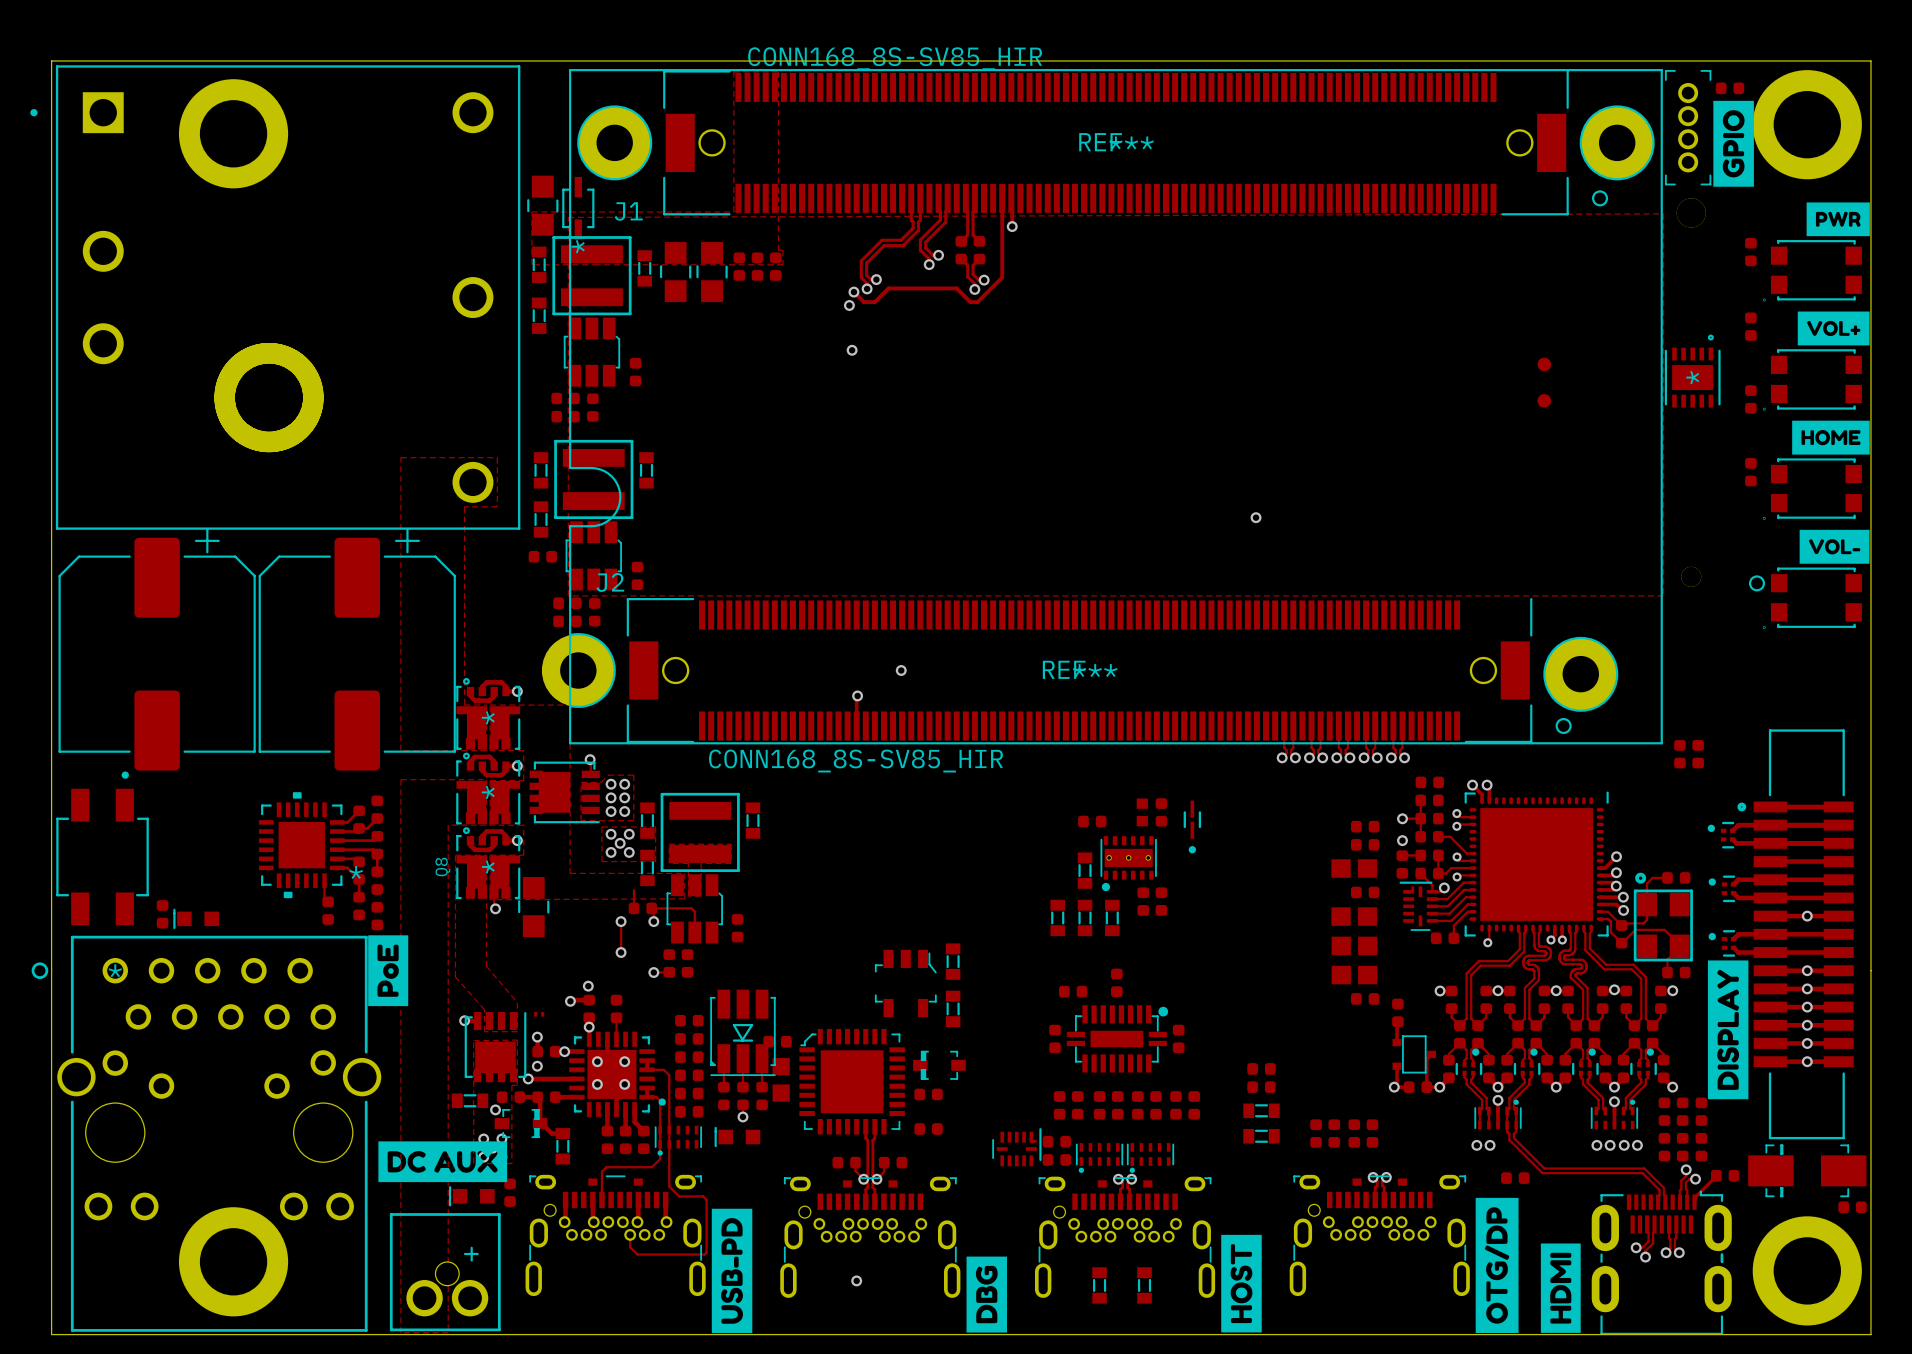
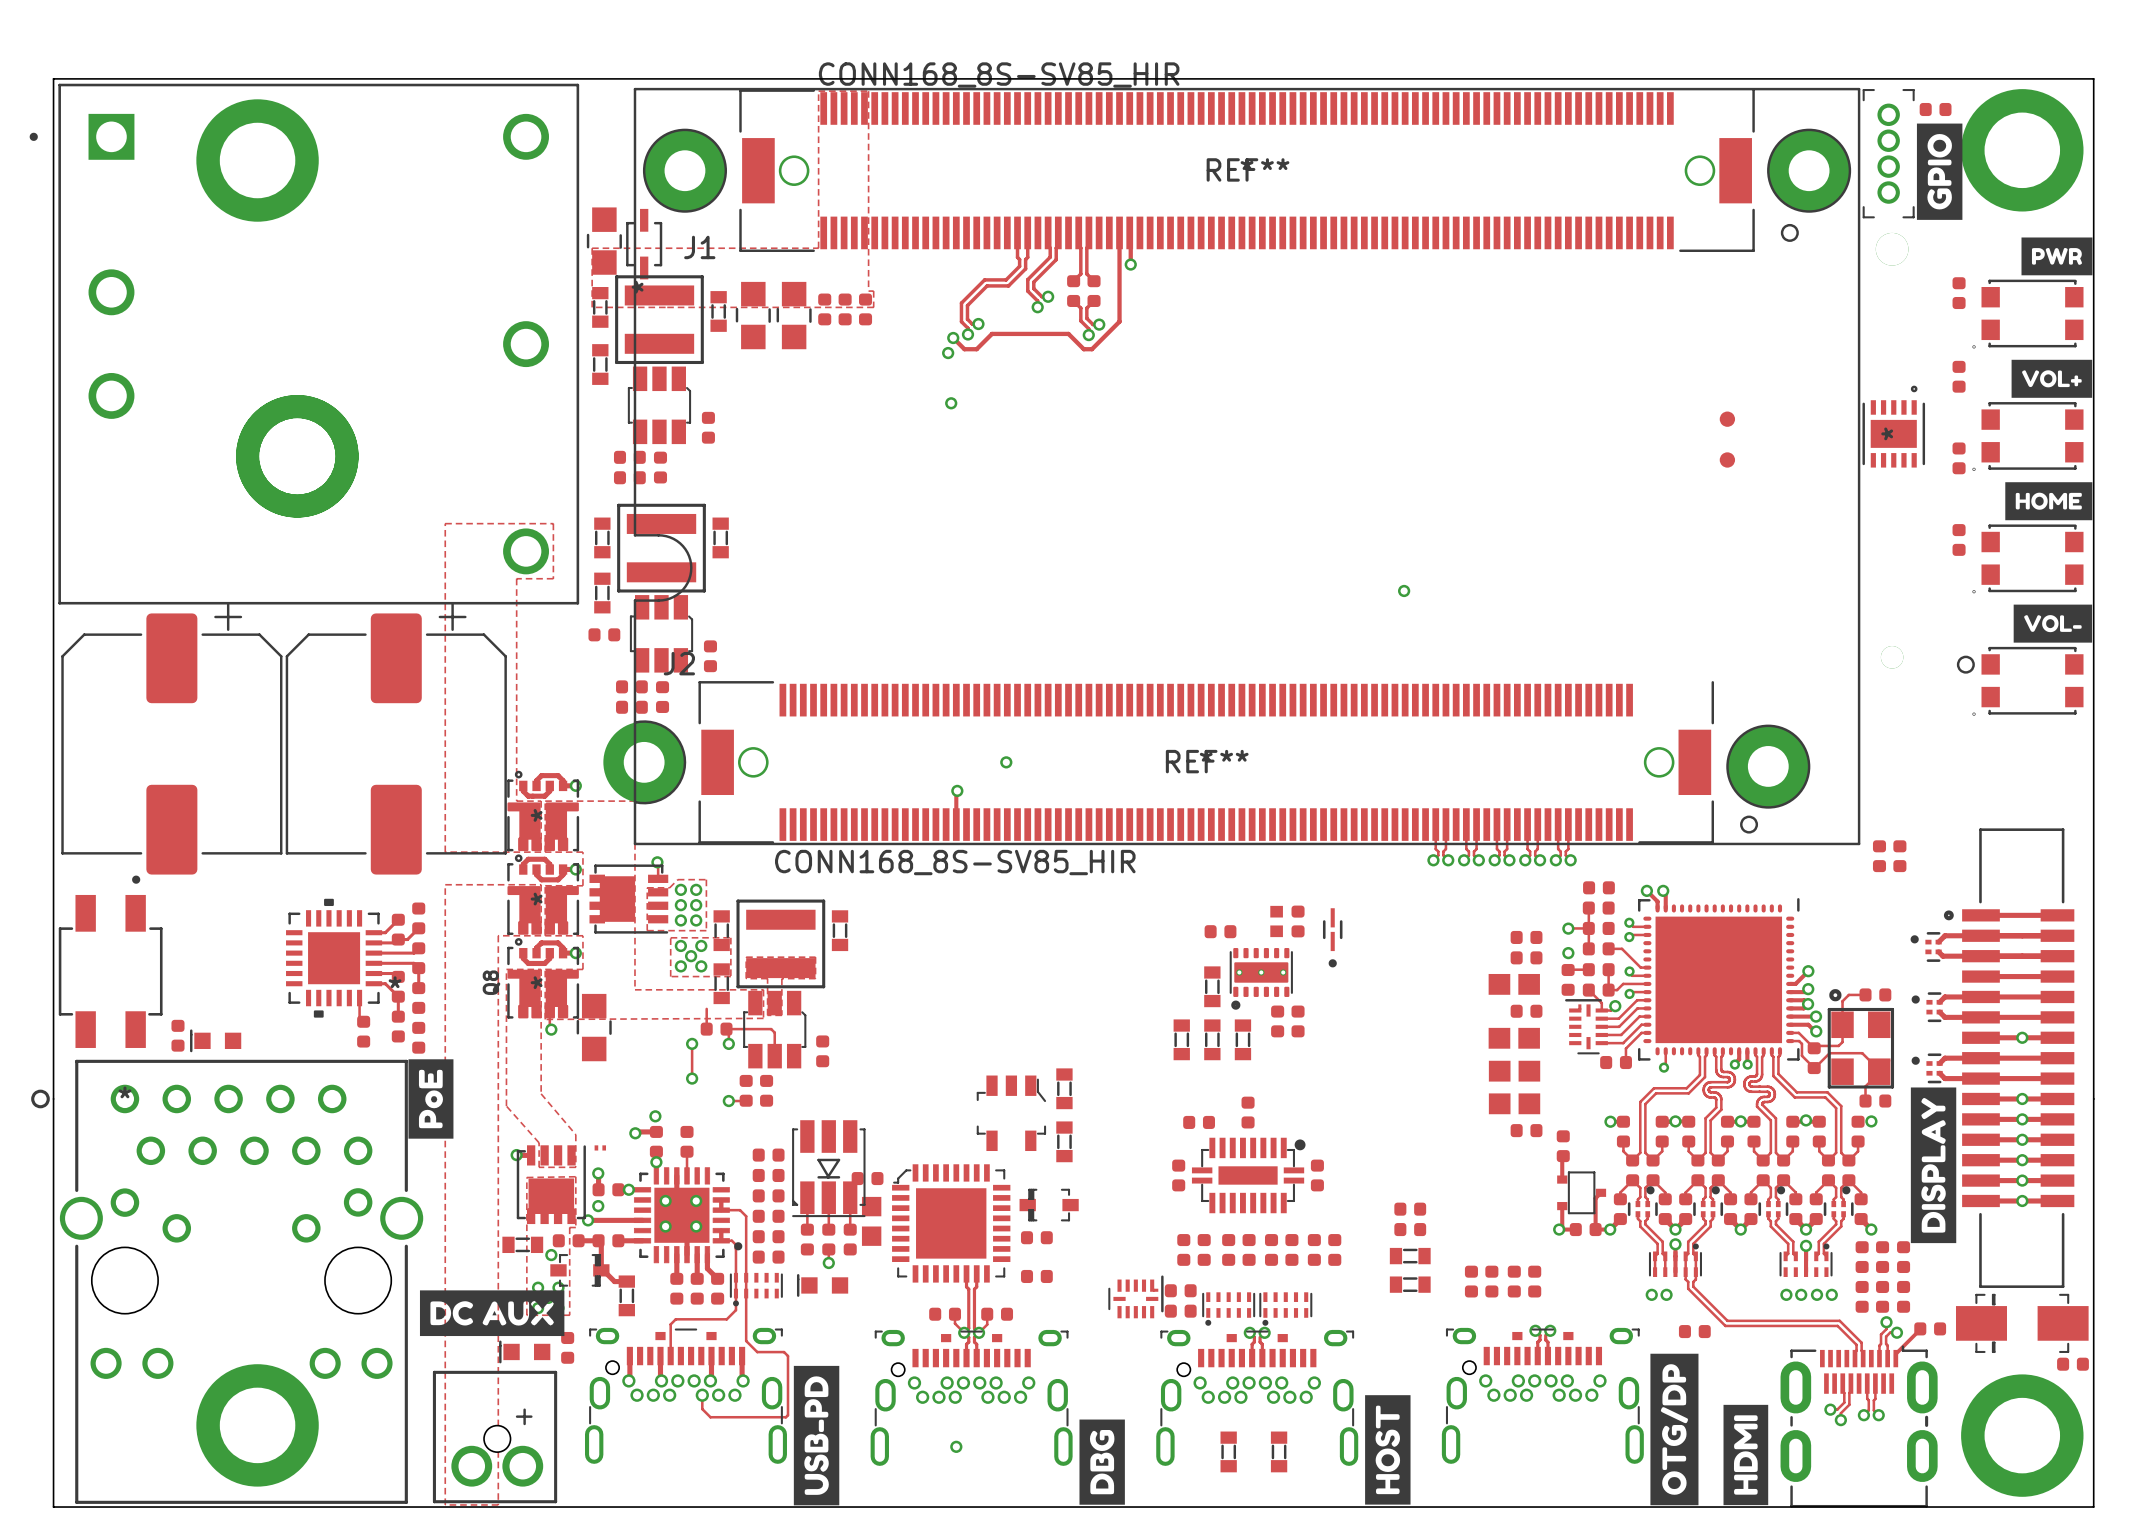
zone outline: (1663, 213) (568, 217) (568, 595) (1663, 595) (1663, 213) -> none

